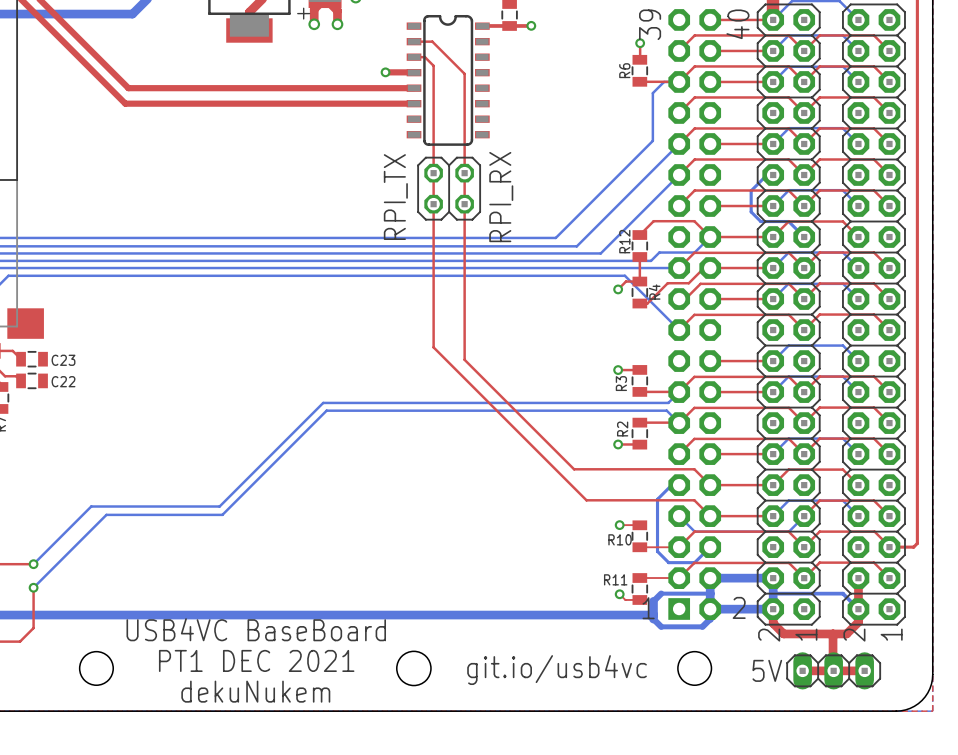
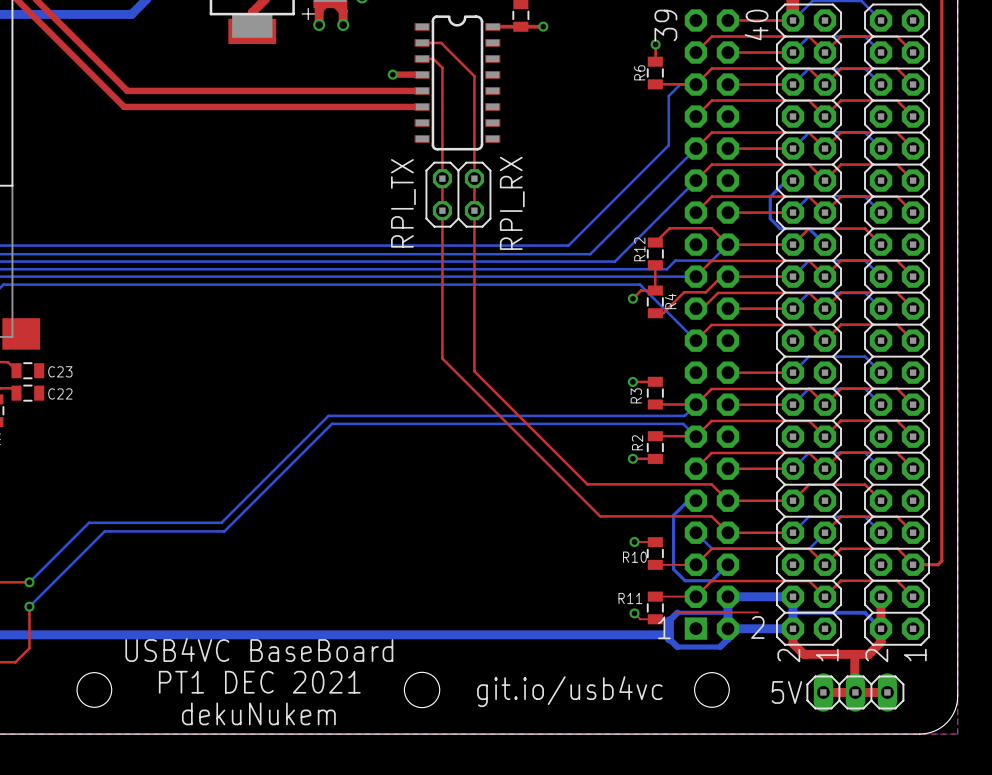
top track: none -> (676, 612) (757, 612)

